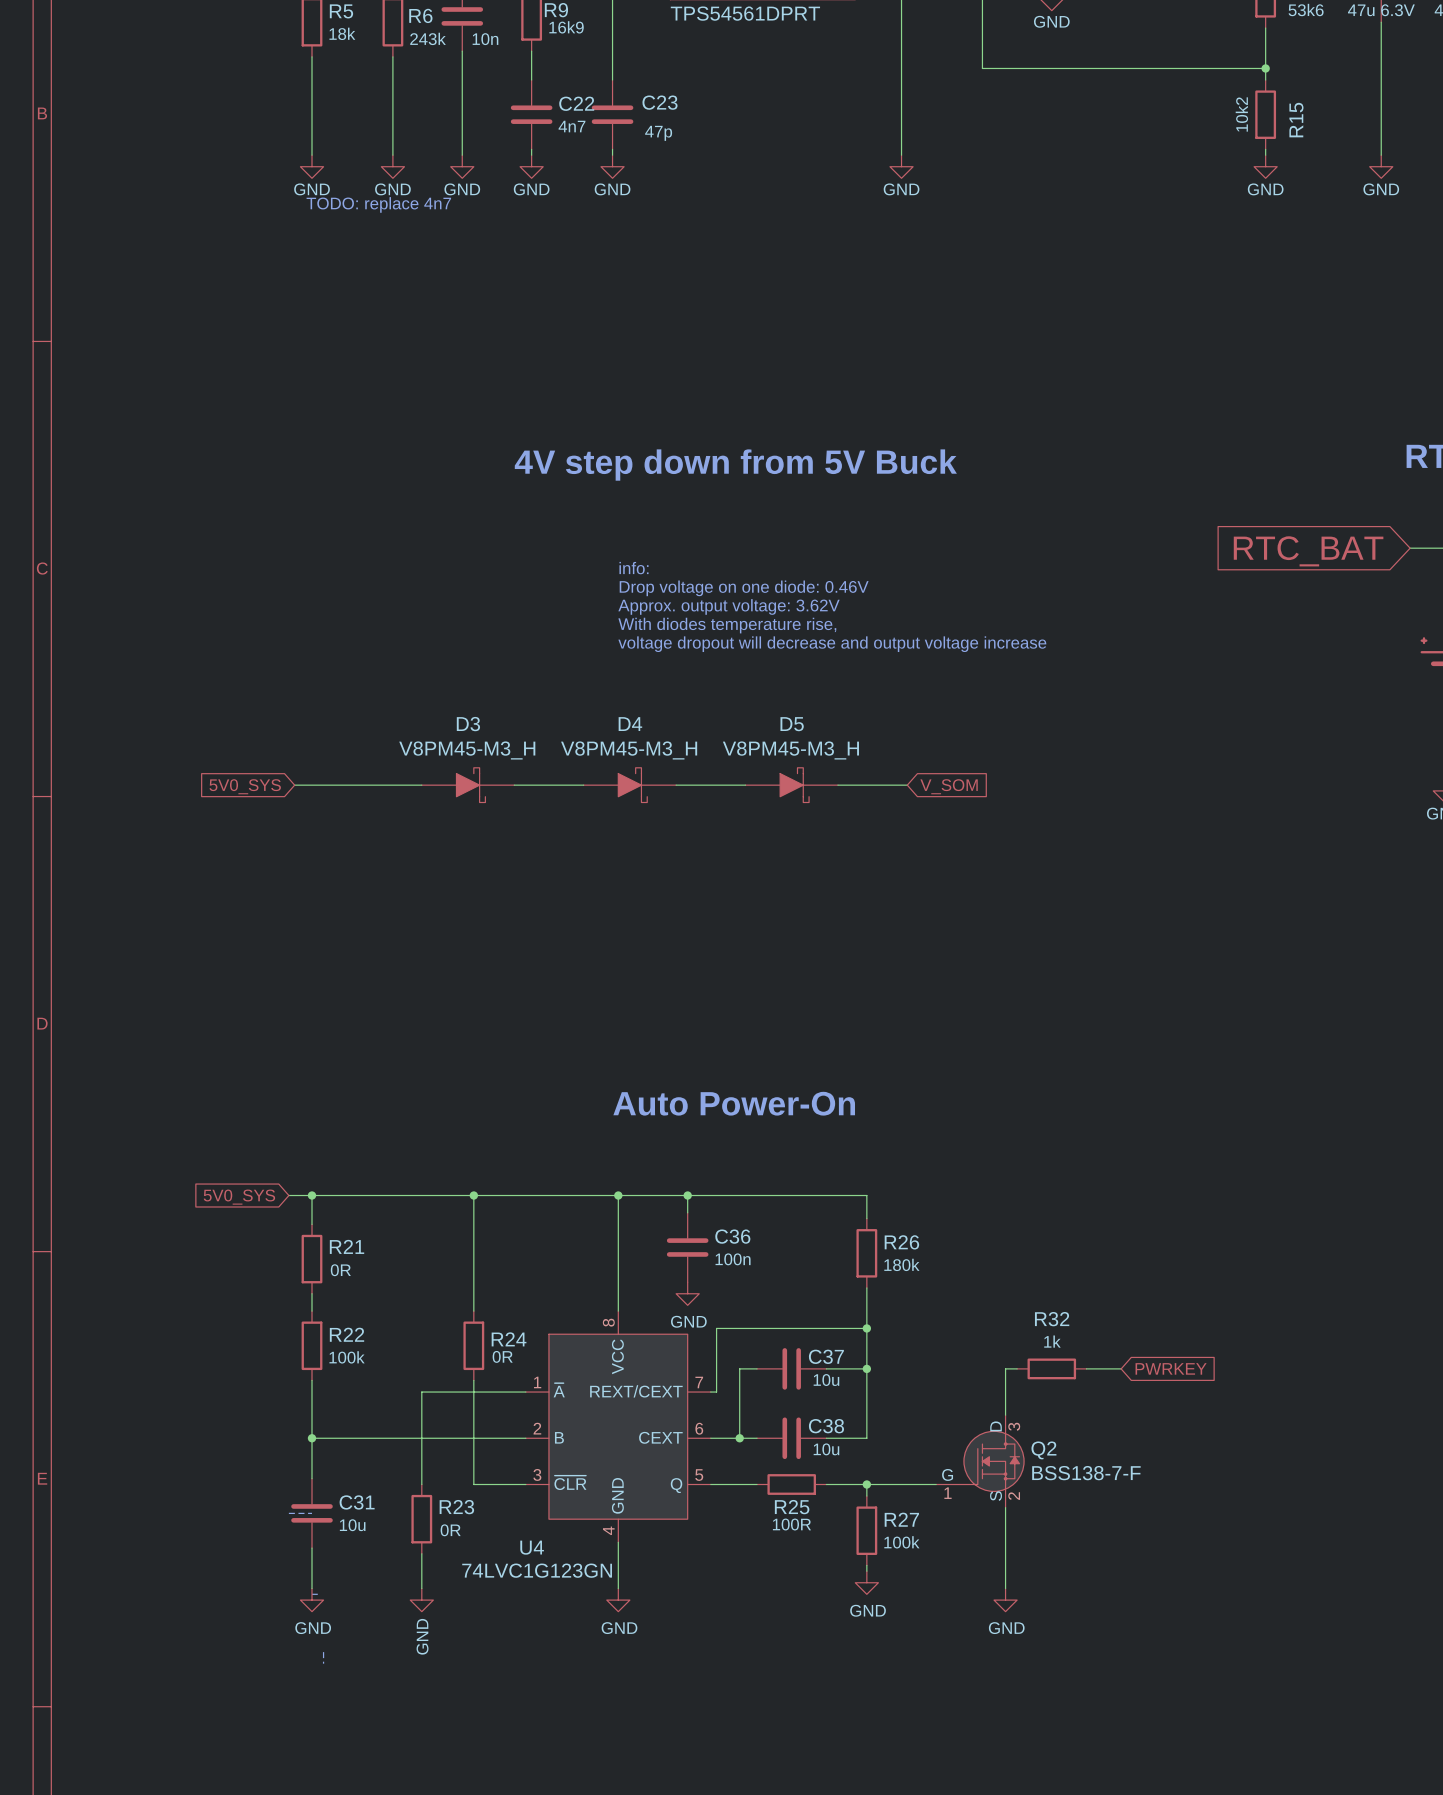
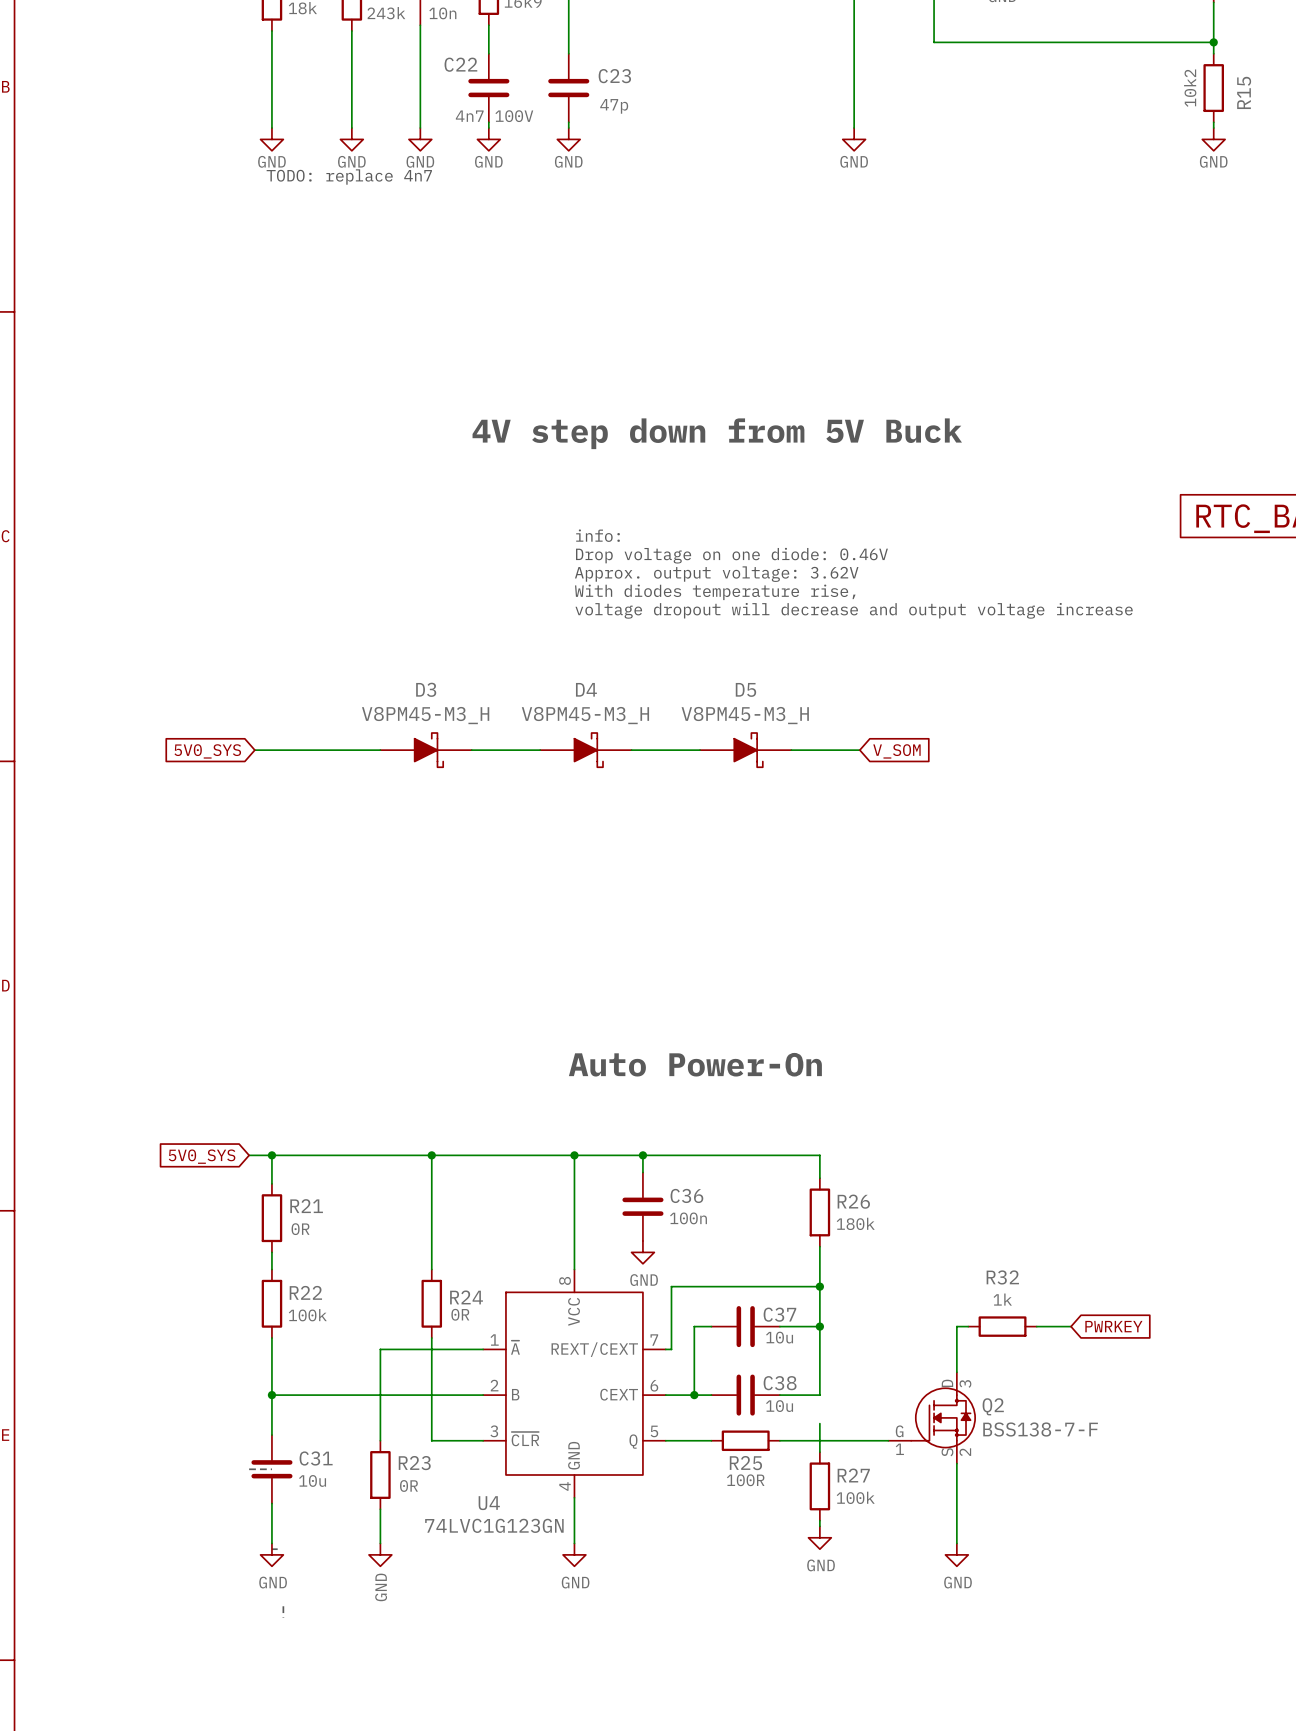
C22 name position: C22 (576, 103) -> C22 (460, 64)
C22 text: 4n7 (572, 126) -> 4n7 100V (494, 116)
wire: none -> (819, 1423) (819, 1440)
junction: (866, 1484) -> none

